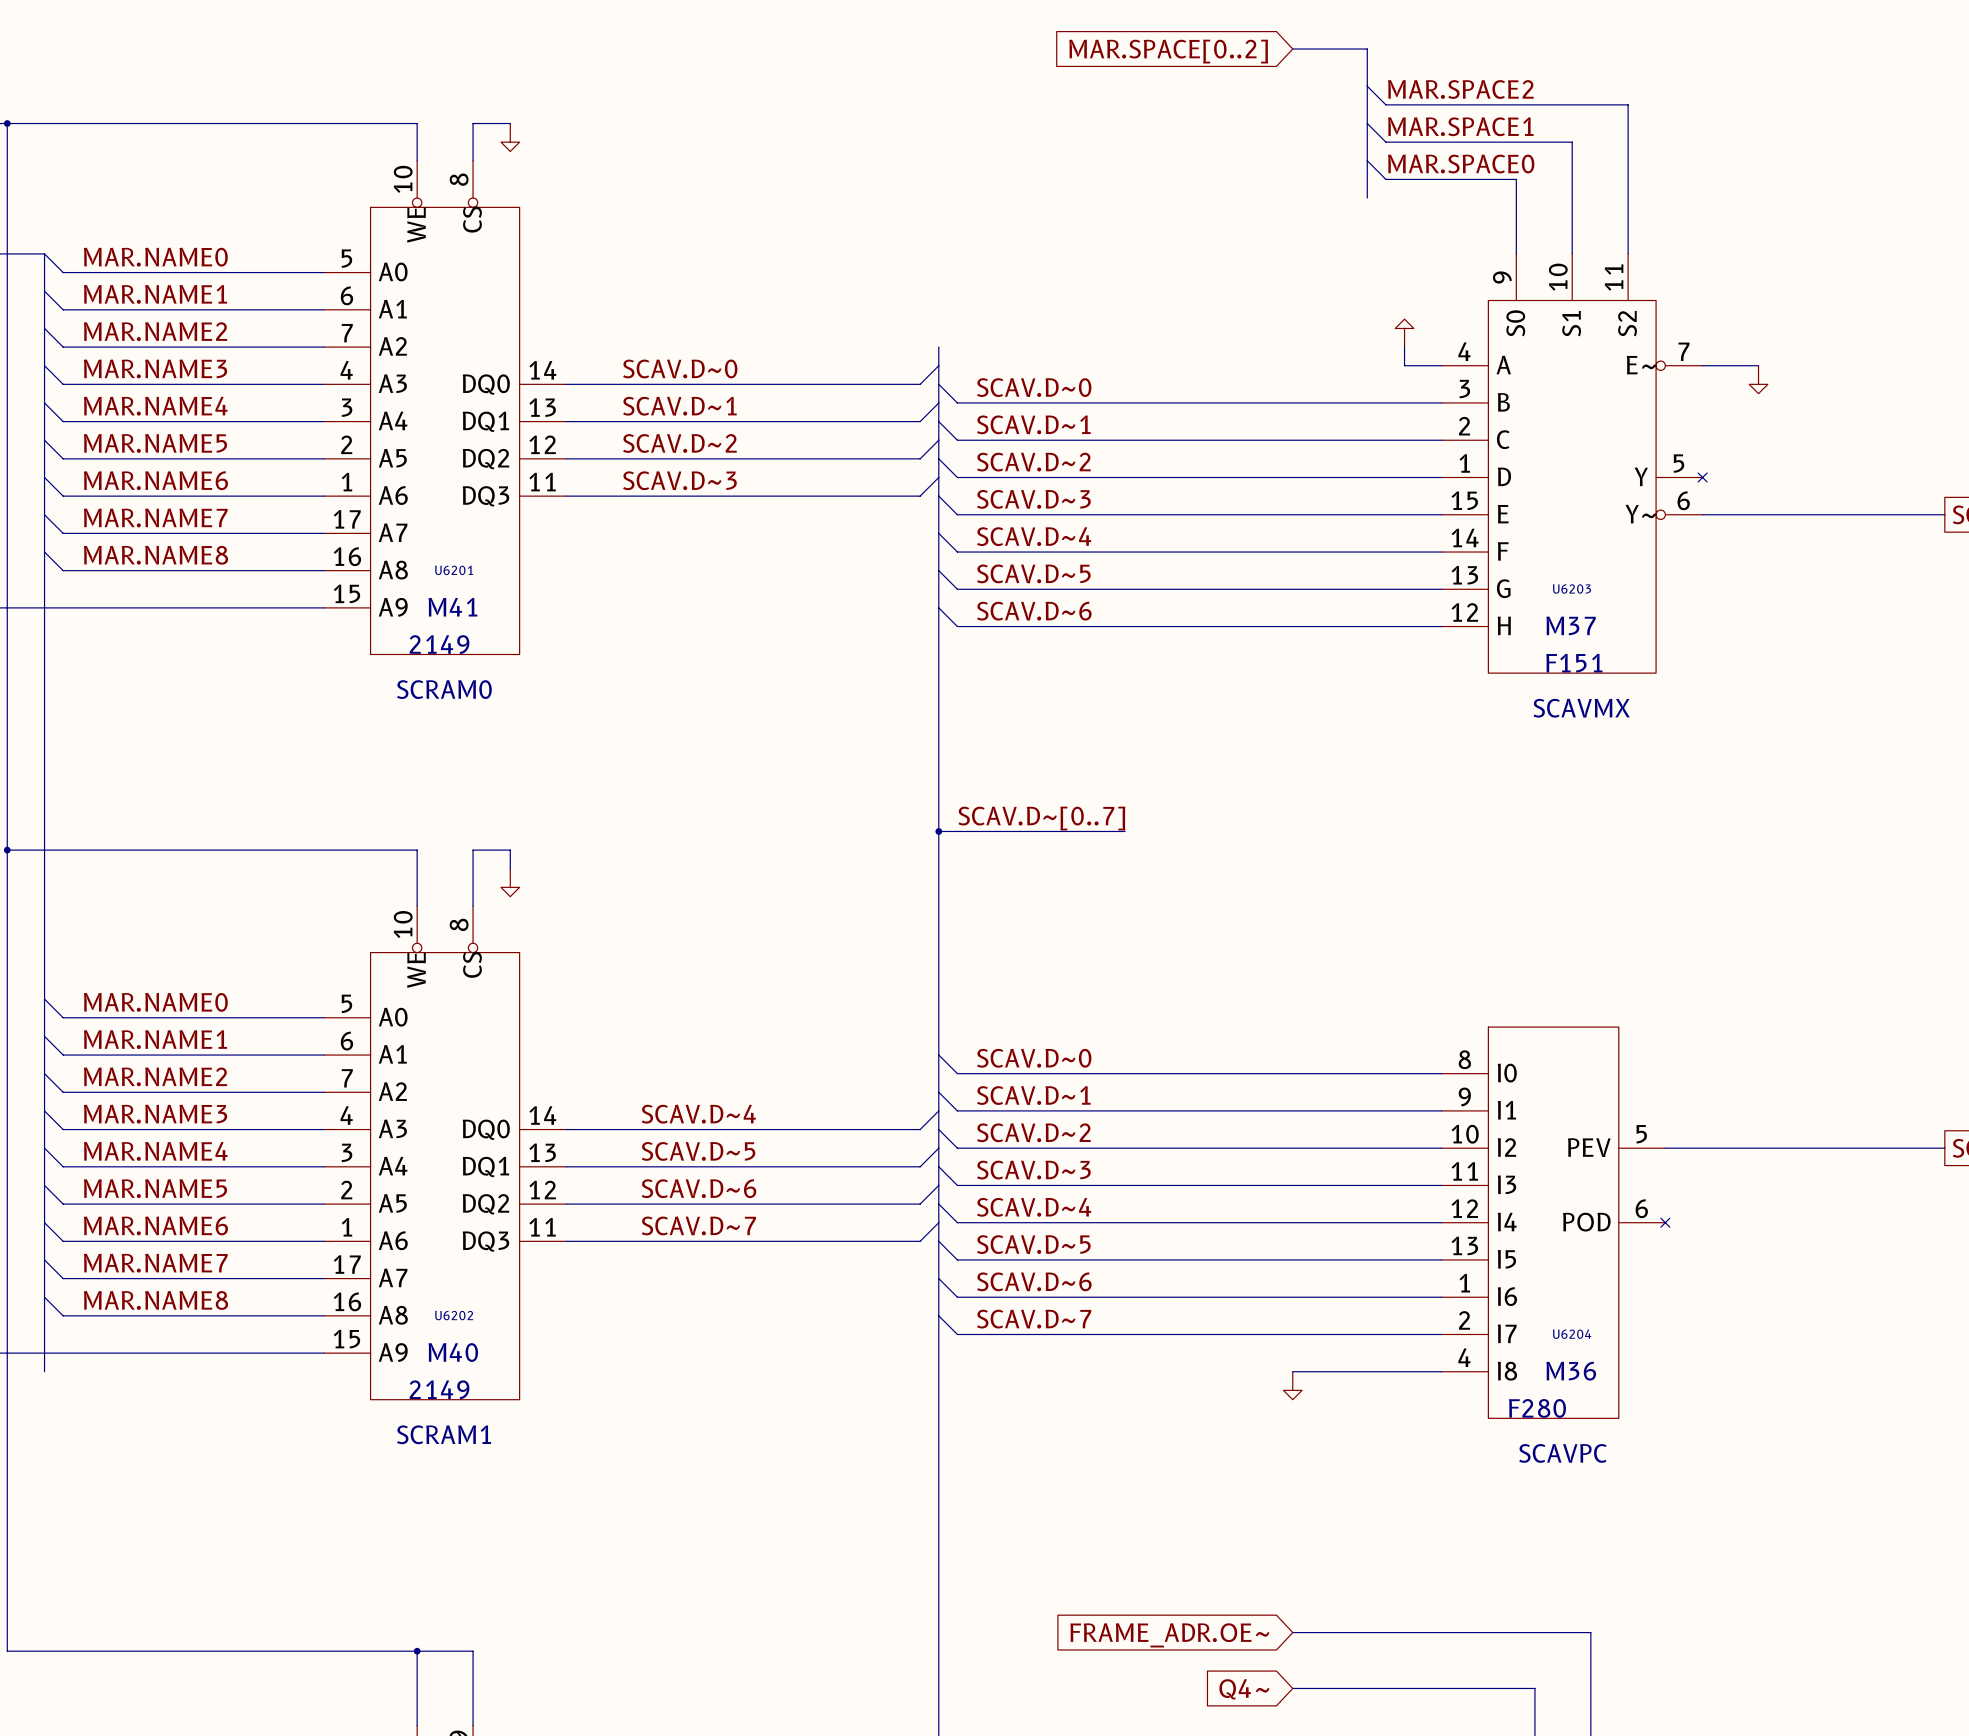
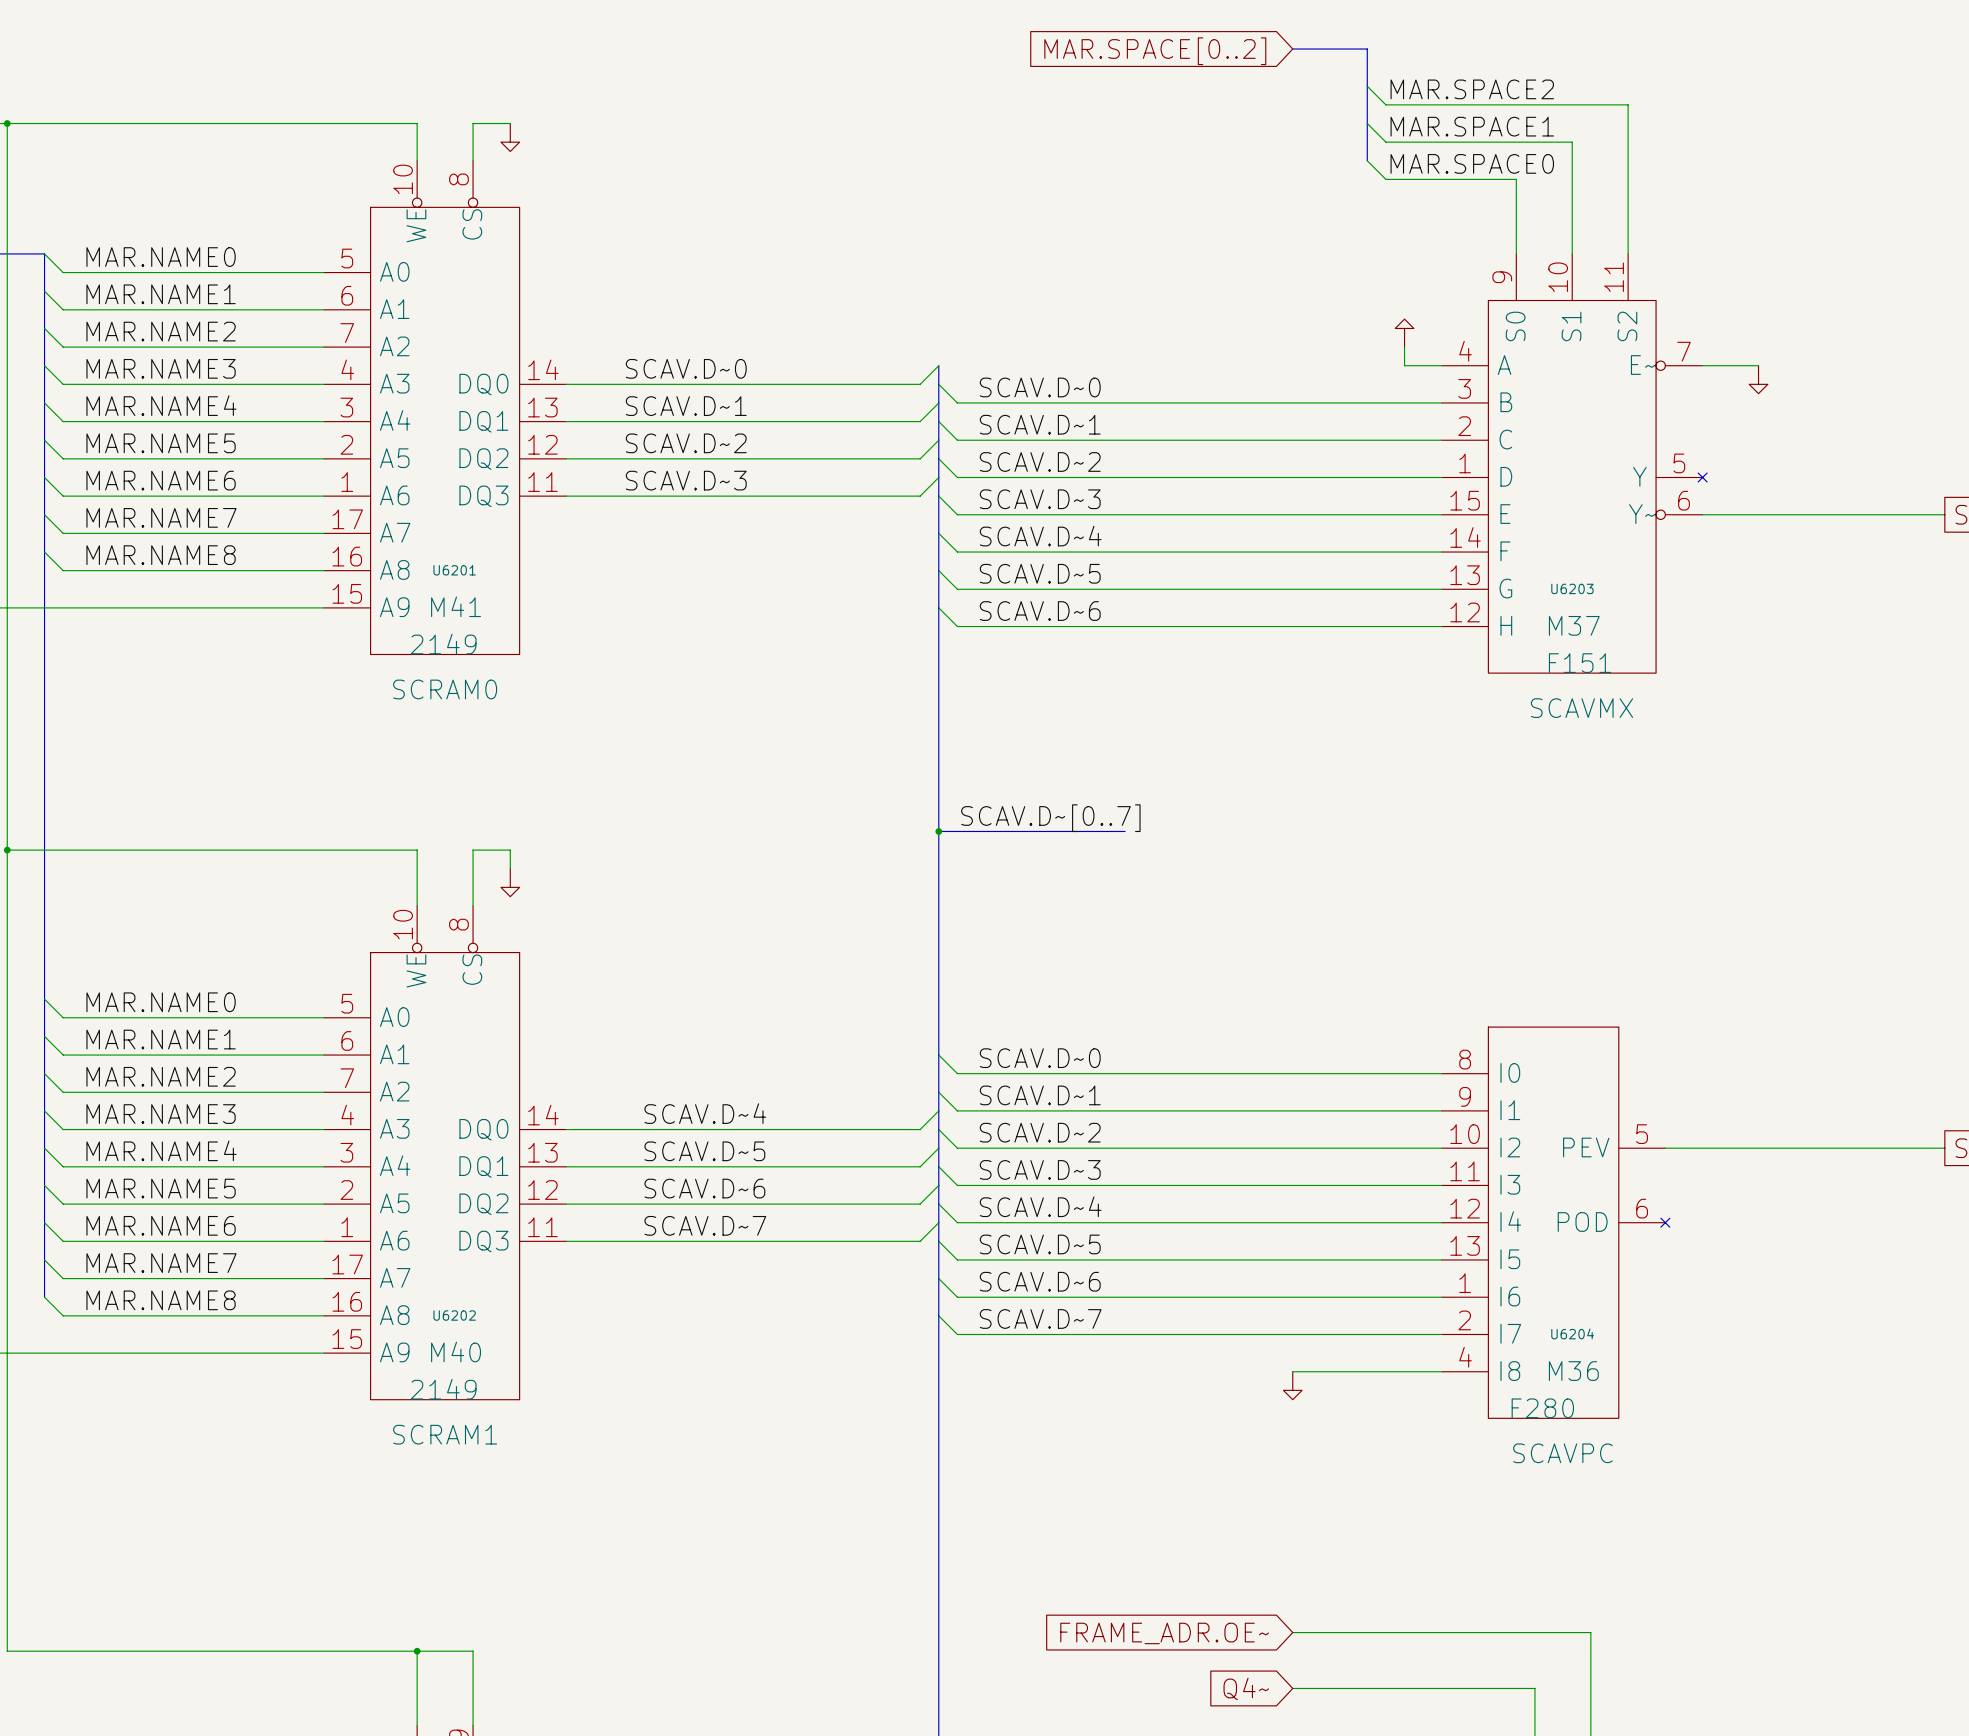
bus: (1367, 160) (1367, 198) -> none
bus: (938, 347) (938, 365) -> none
bus: (44, 1297) (44, 1371) -> none

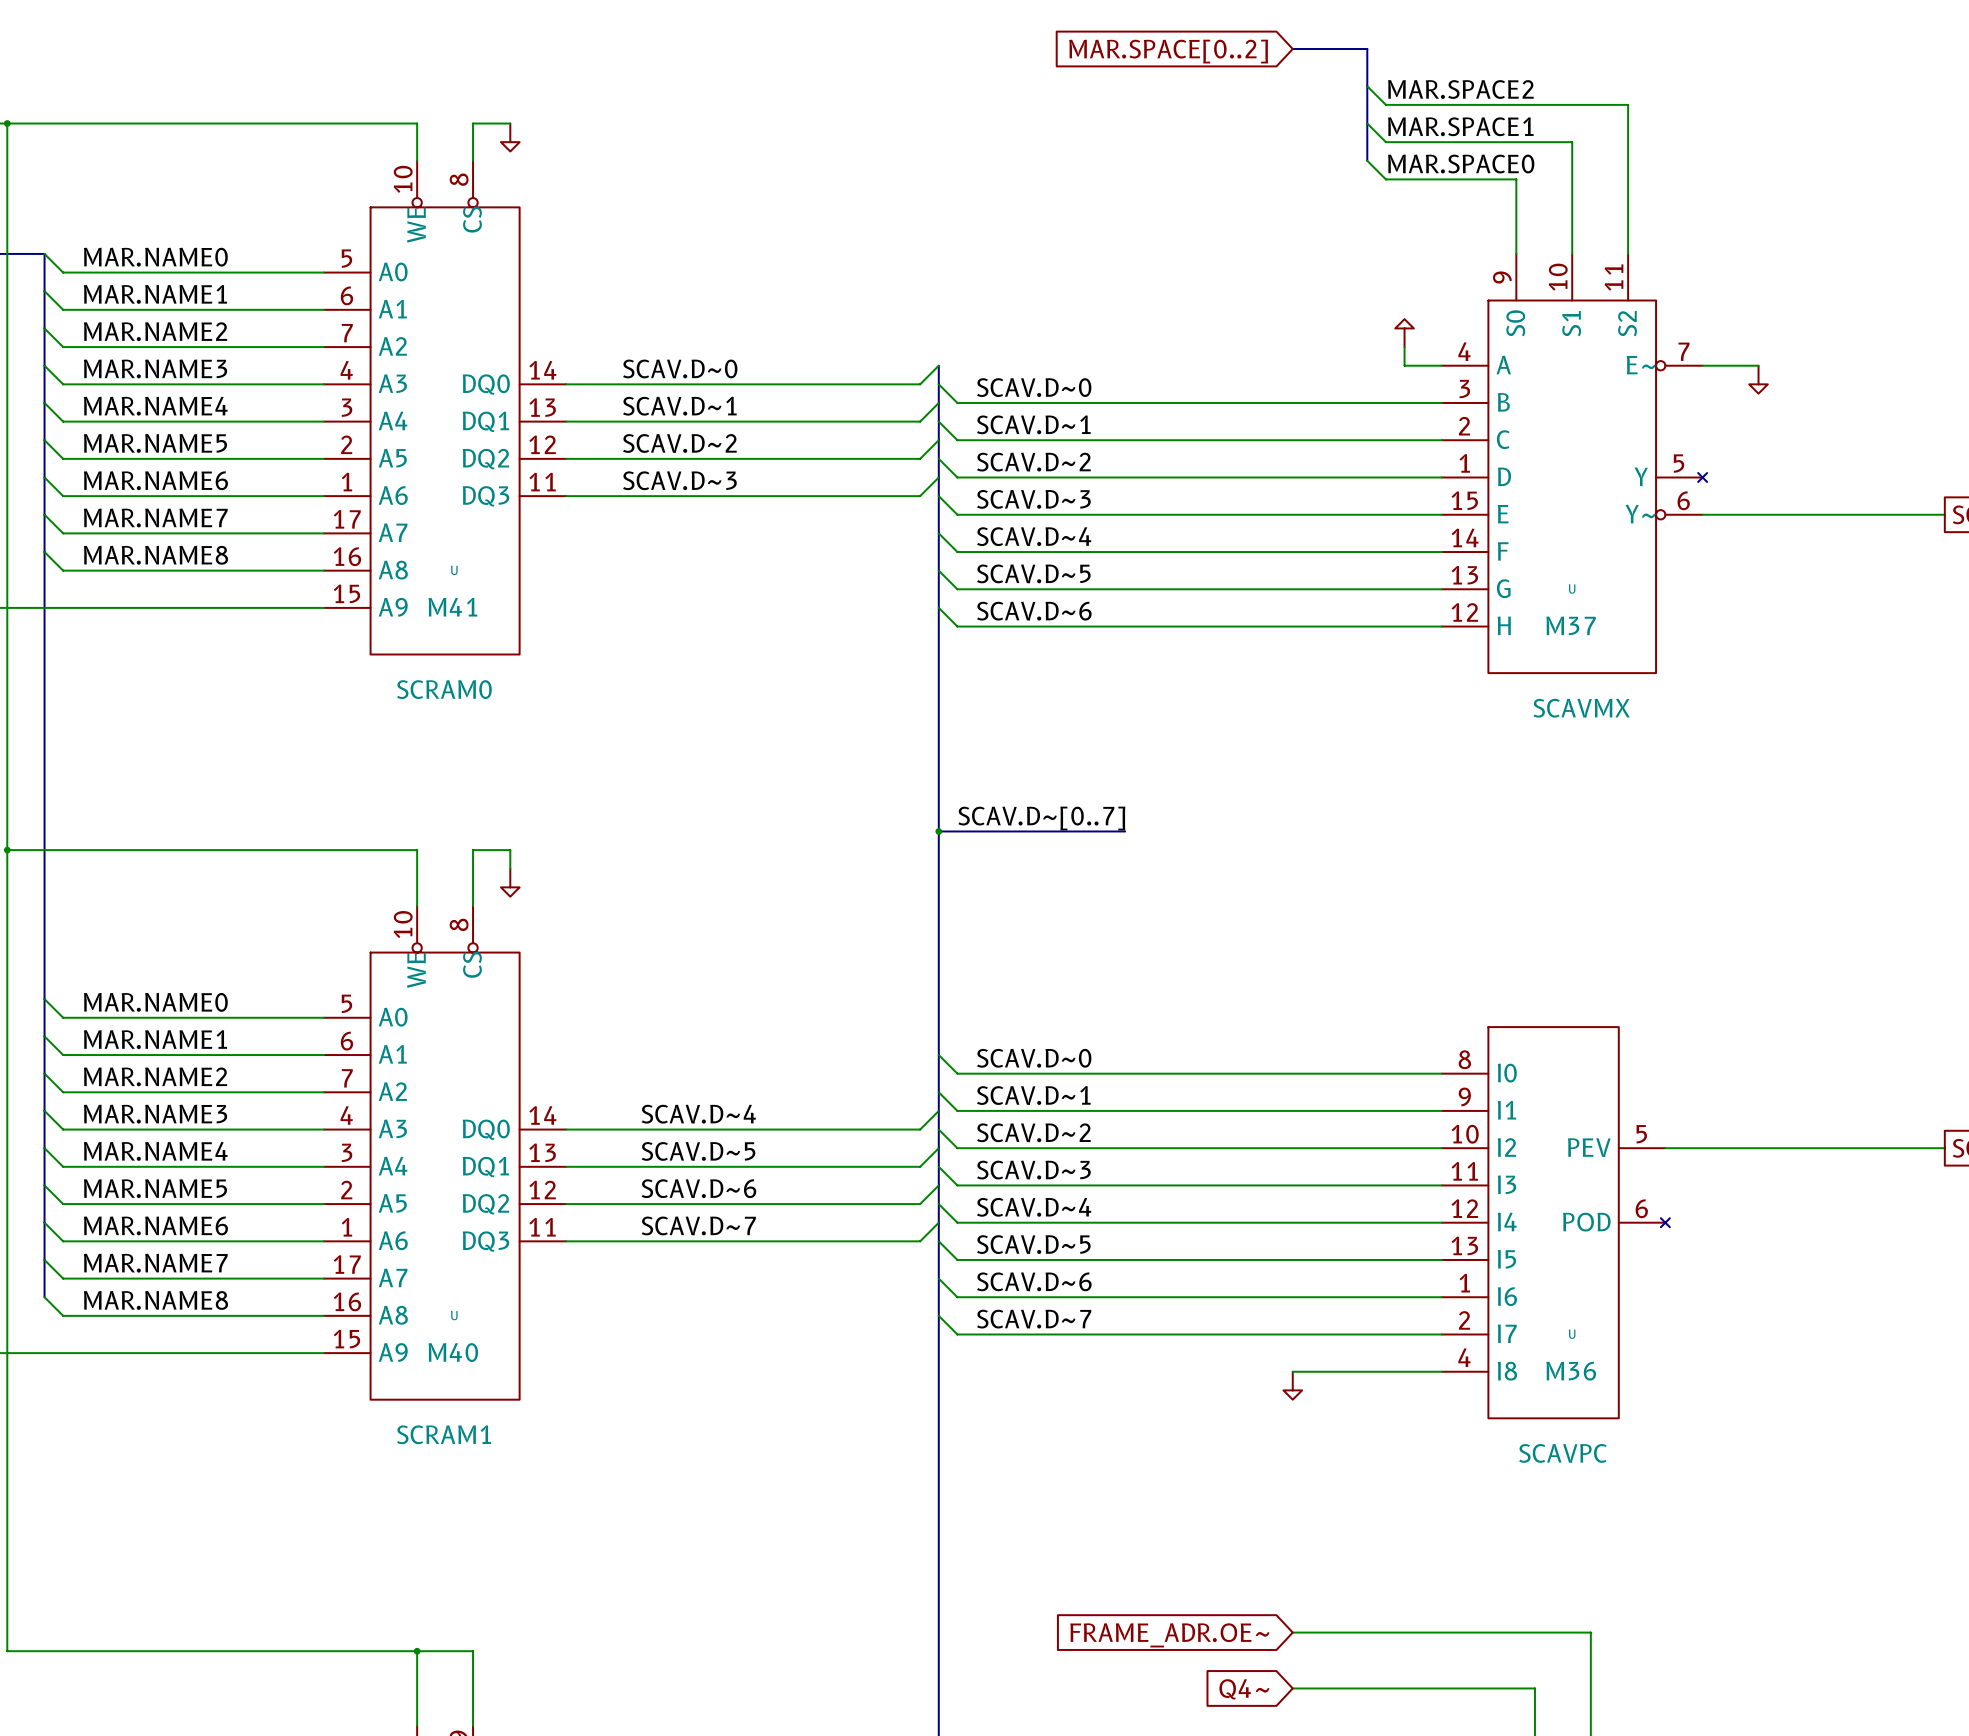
U6201 name: U6201 (454, 570) -> U (454, 570)
U6203 name: U6203 (1572, 588) -> U (1572, 588)
U6201 value: 2149 (443, 644) -> none
U6203 value: F151 (1580, 663) -> none
U6202 name: U6202 (454, 1315) -> U (454, 1315)
U6204 name: U6204 (1572, 1333) -> U (1572, 1334)
U6202 value: 2149 (443, 1389) -> none
U6204 value: F280 (1542, 1408) -> none

